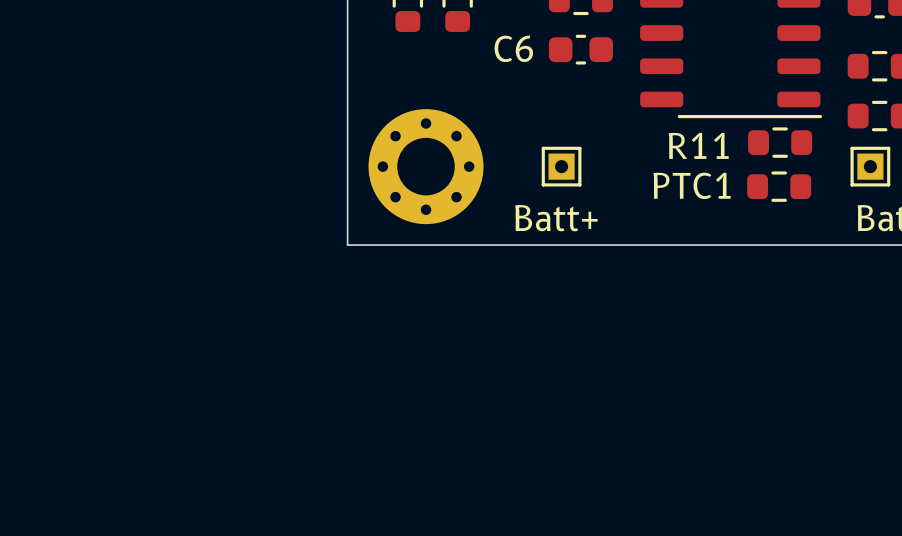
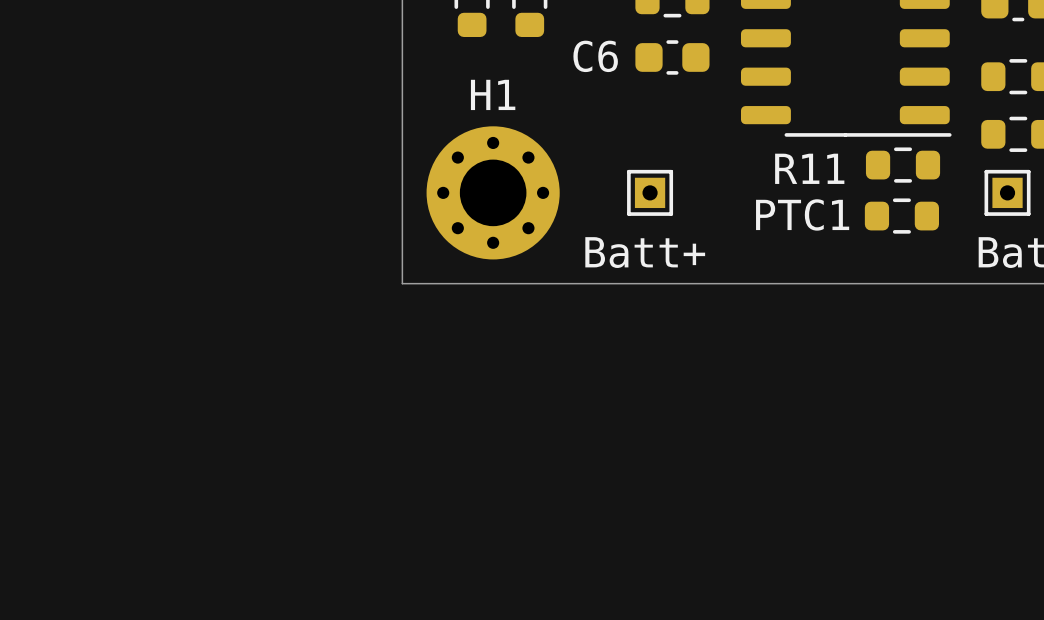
H1 name: none -> H1 (493, 94)

